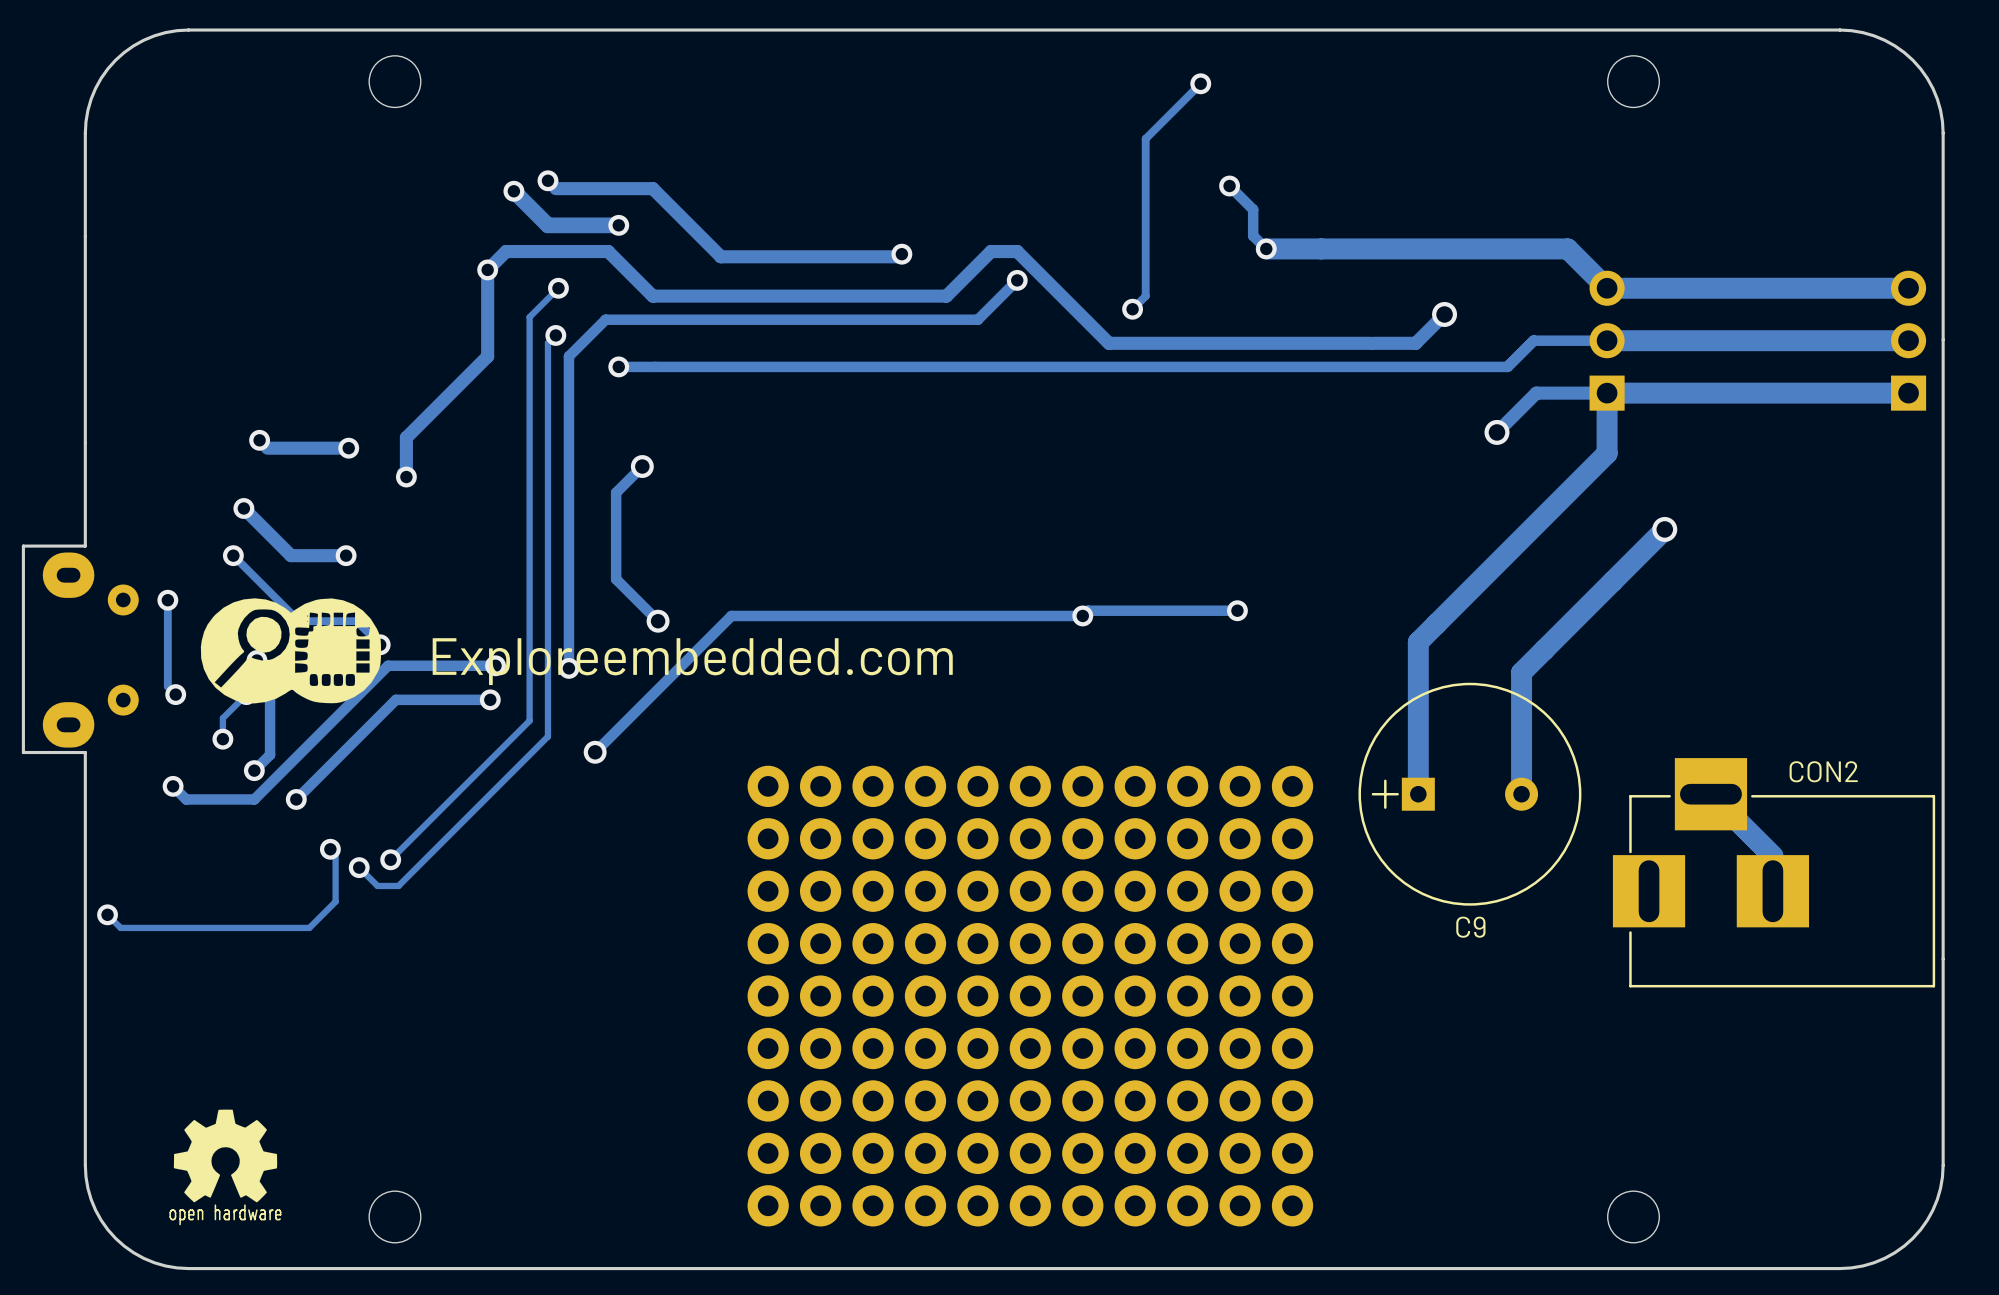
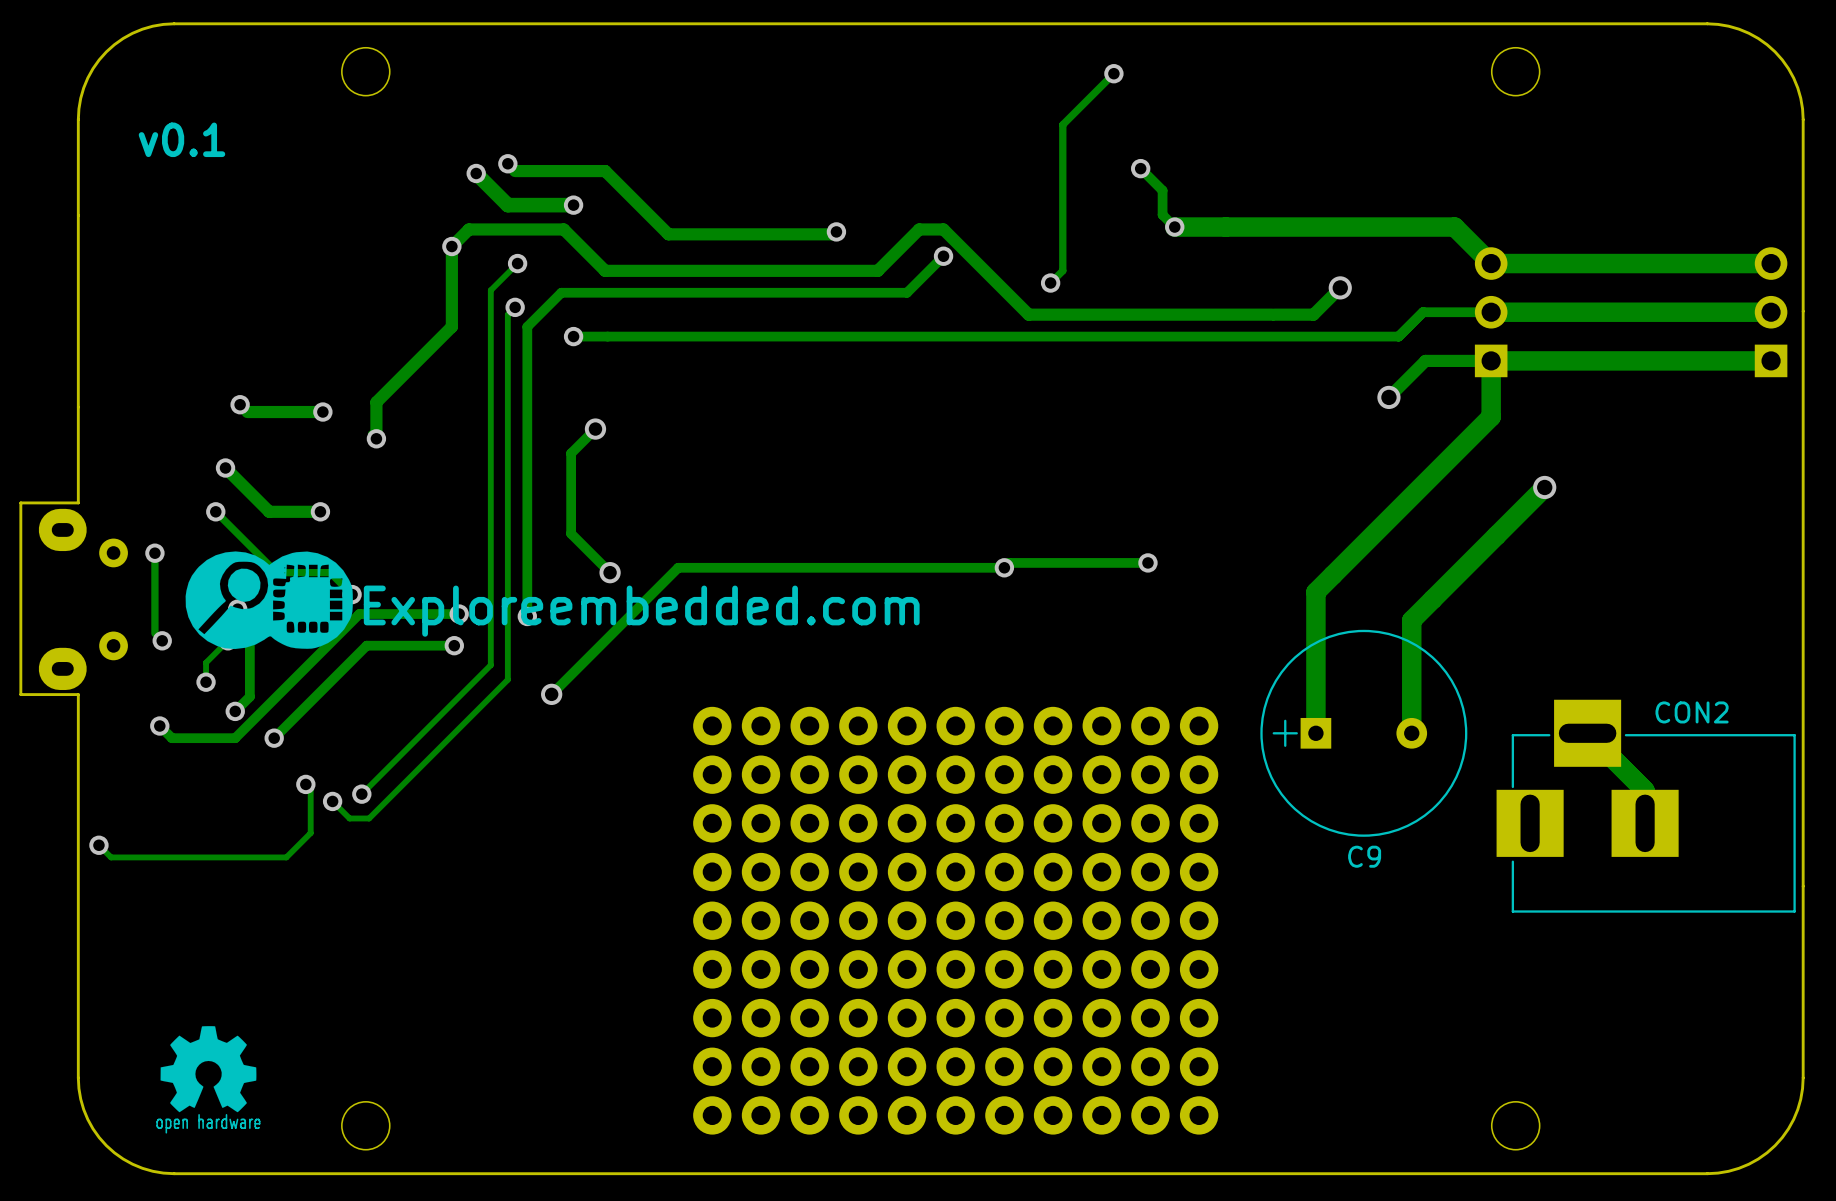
text: none -> v0.1 (181, 139)

